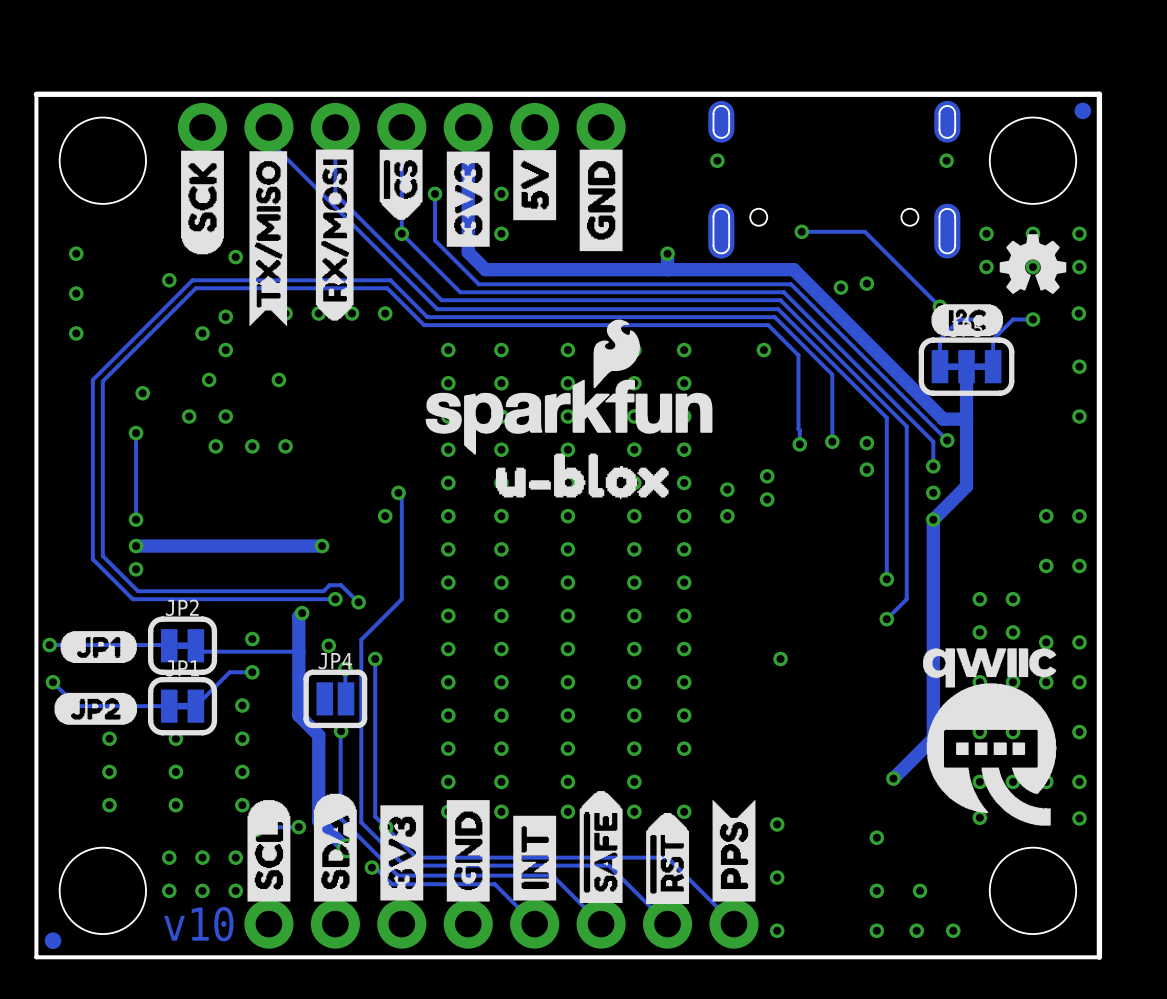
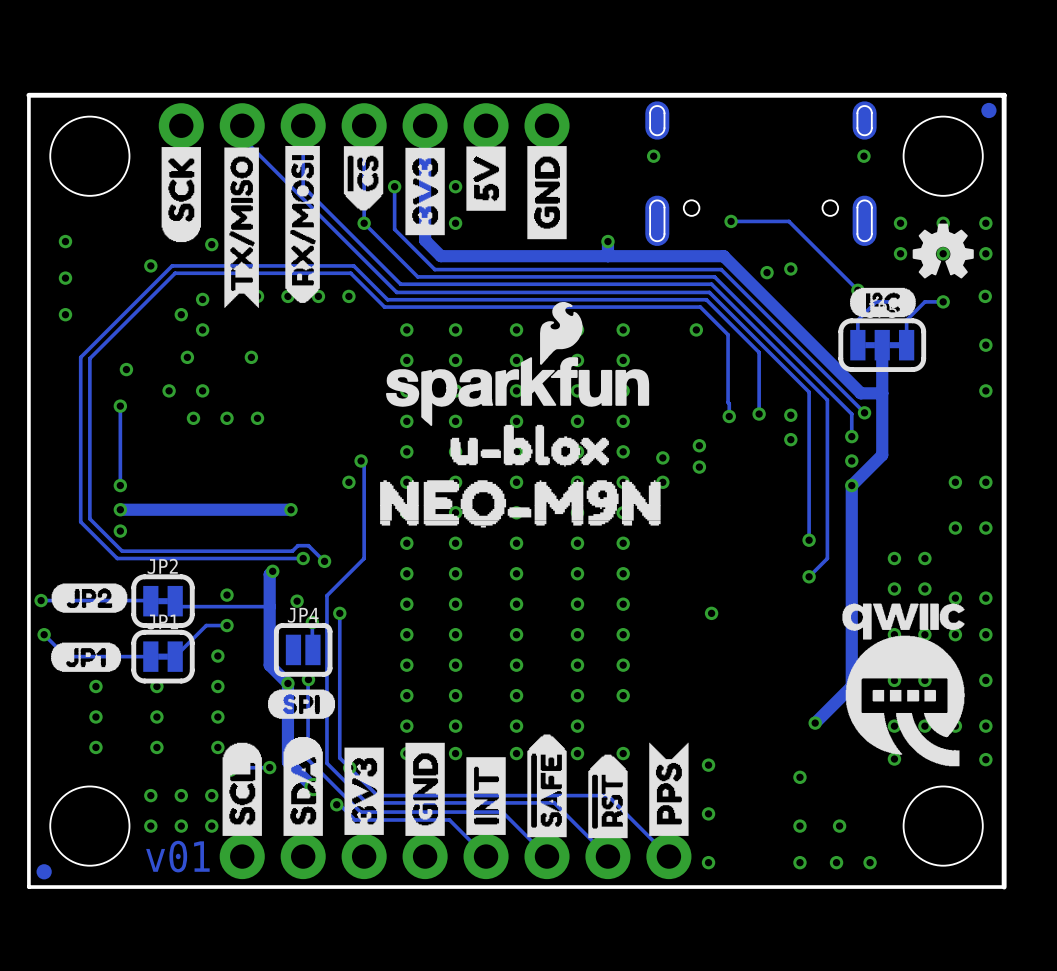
drawing: none -> [380, 480, 661, 528]
drawing position: (98, 647) -> (86, 657)
drawing position: (95, 708) -> (89, 598)
via: none -> (287, 683)
drawing: none -> [268, 689, 336, 719]
text: v10 (198, 924) -> v01 (177, 856)

